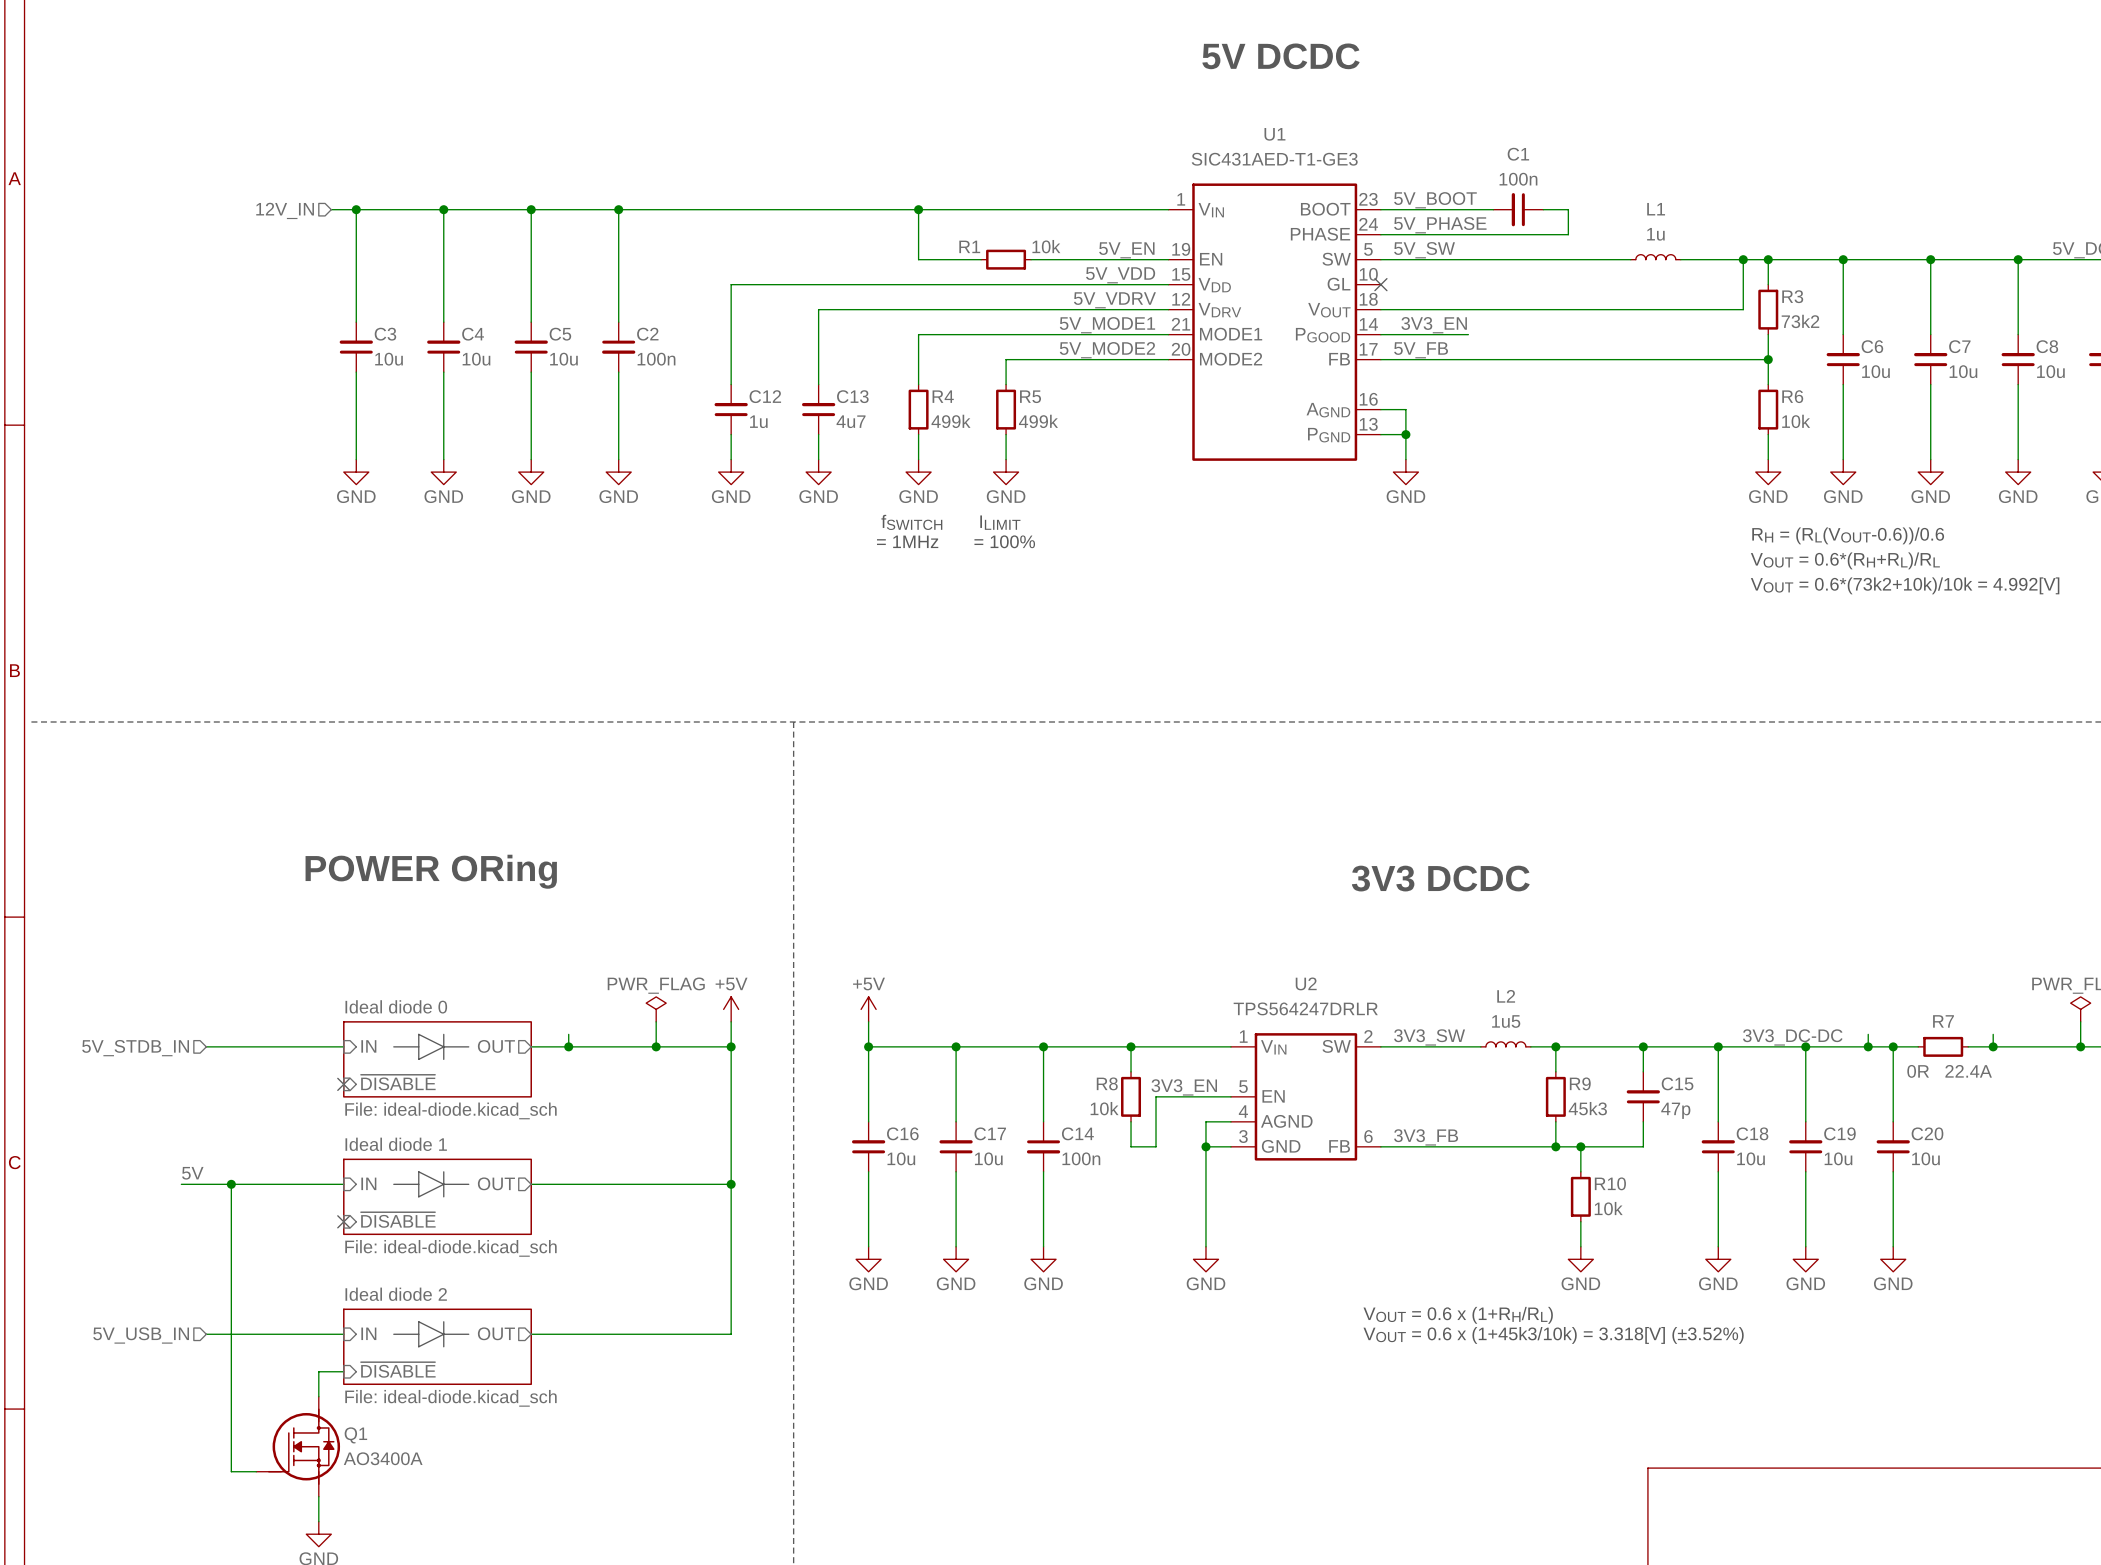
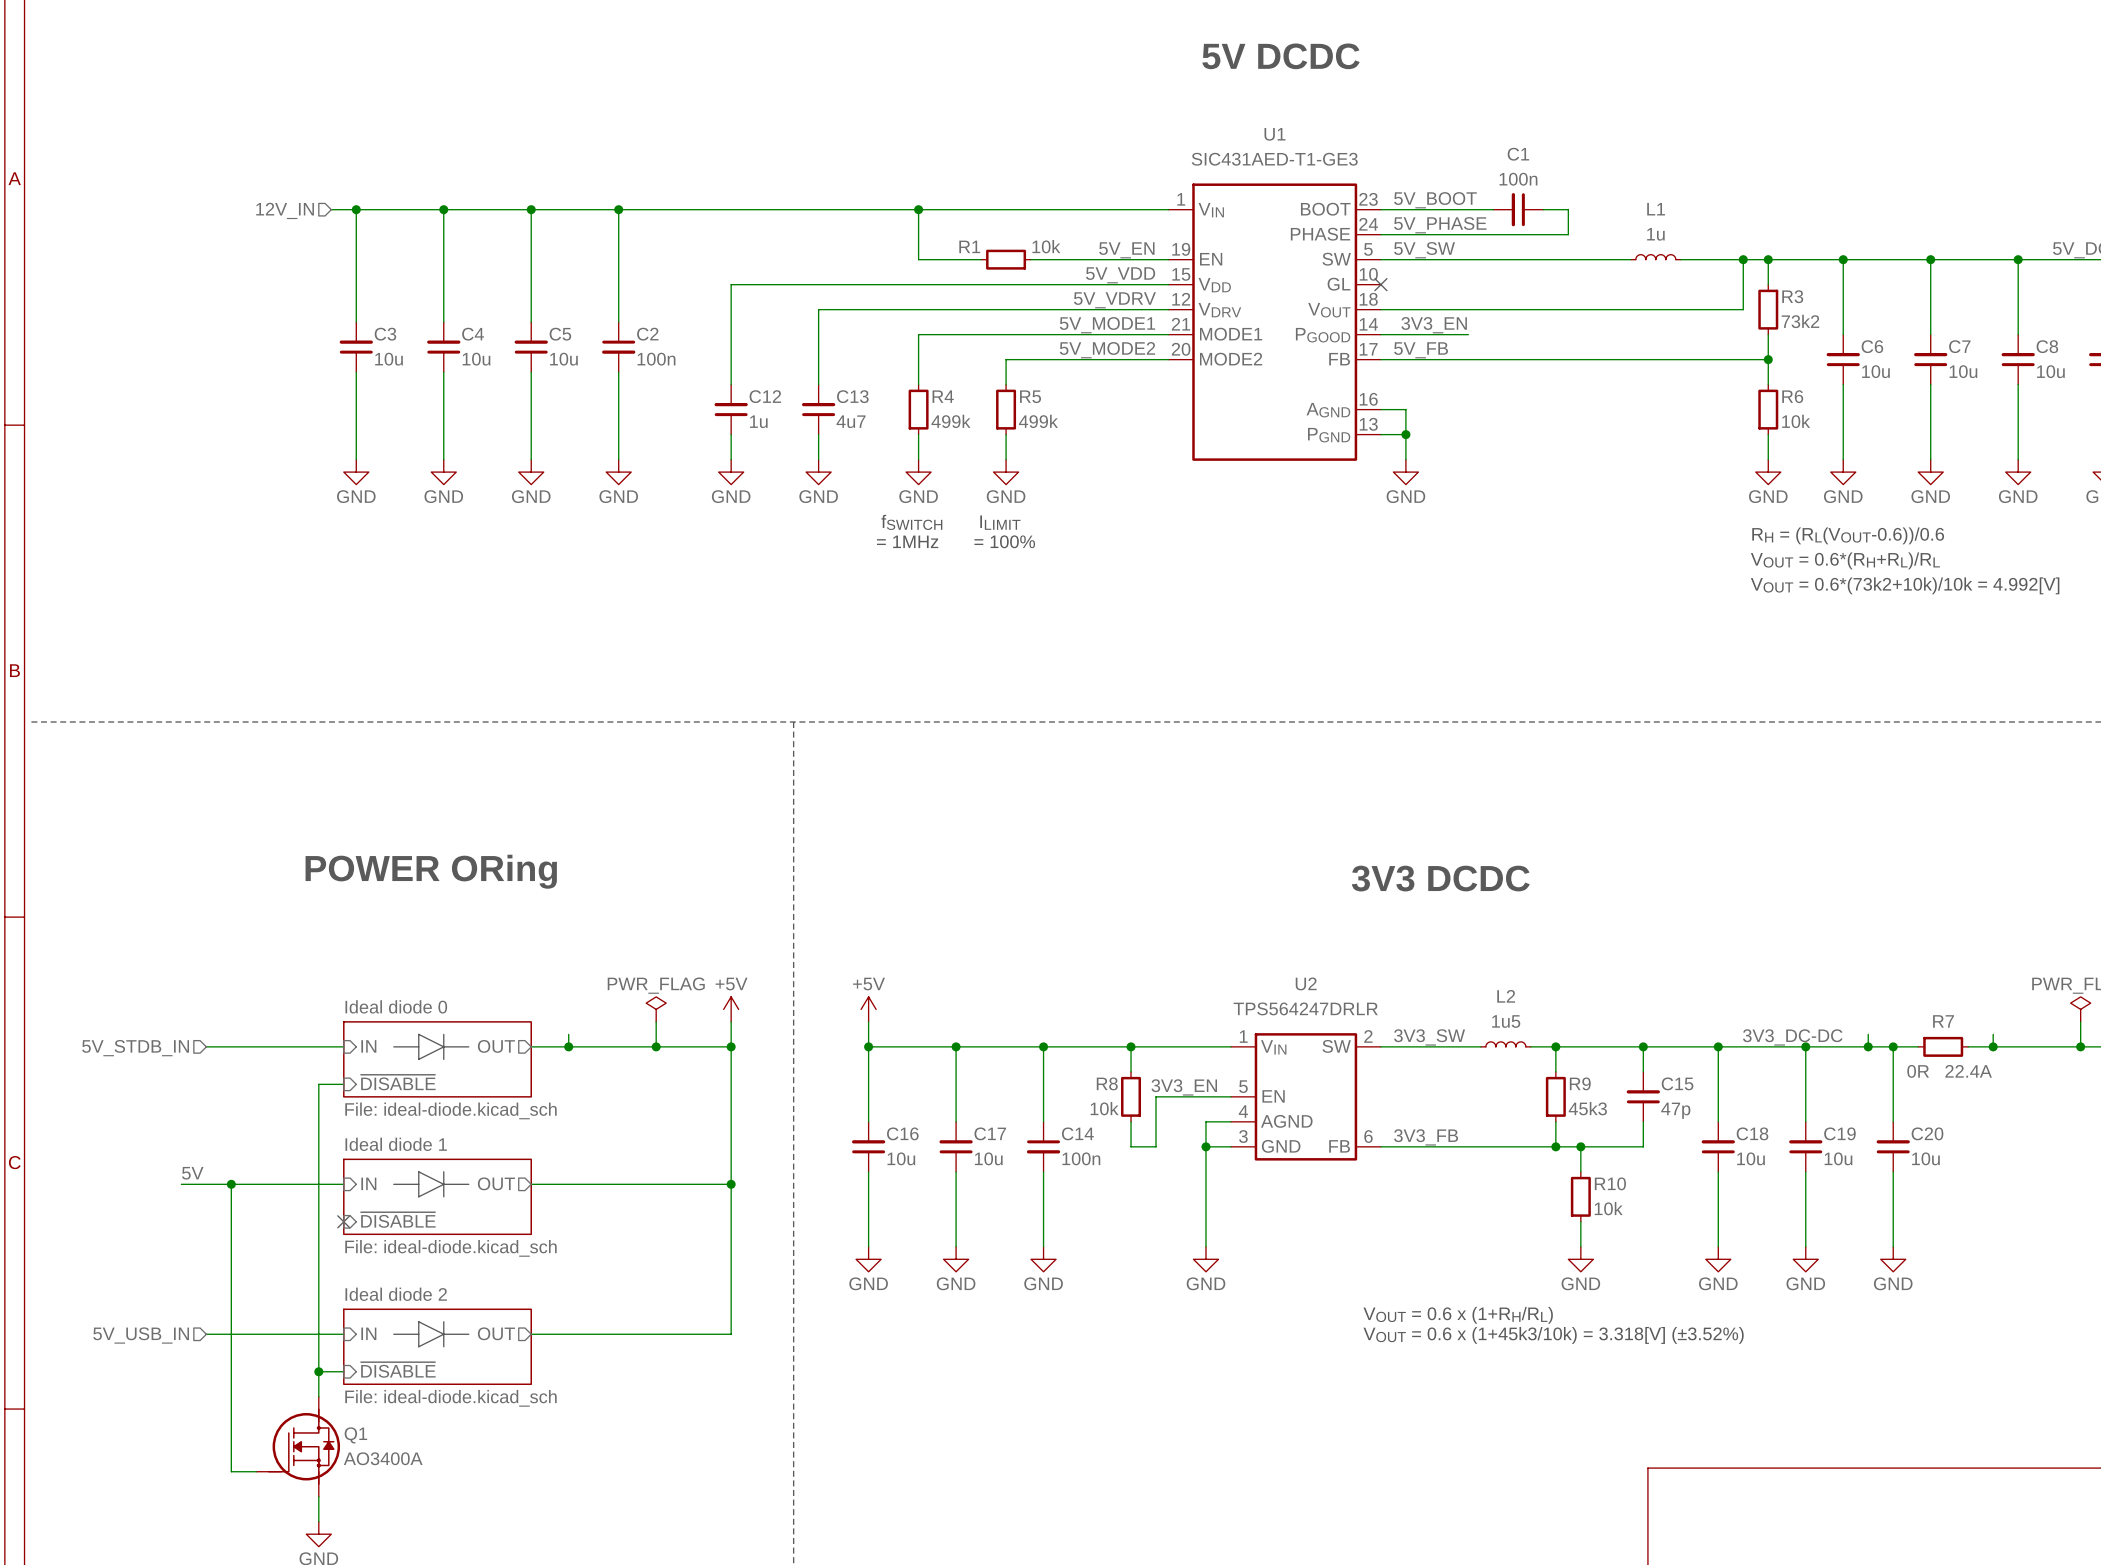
wire: none -> (343, 1084) (318, 1084) (318, 1371)
no-connect mark: (343, 1084) -> none
junction: none -> (318, 1371)

